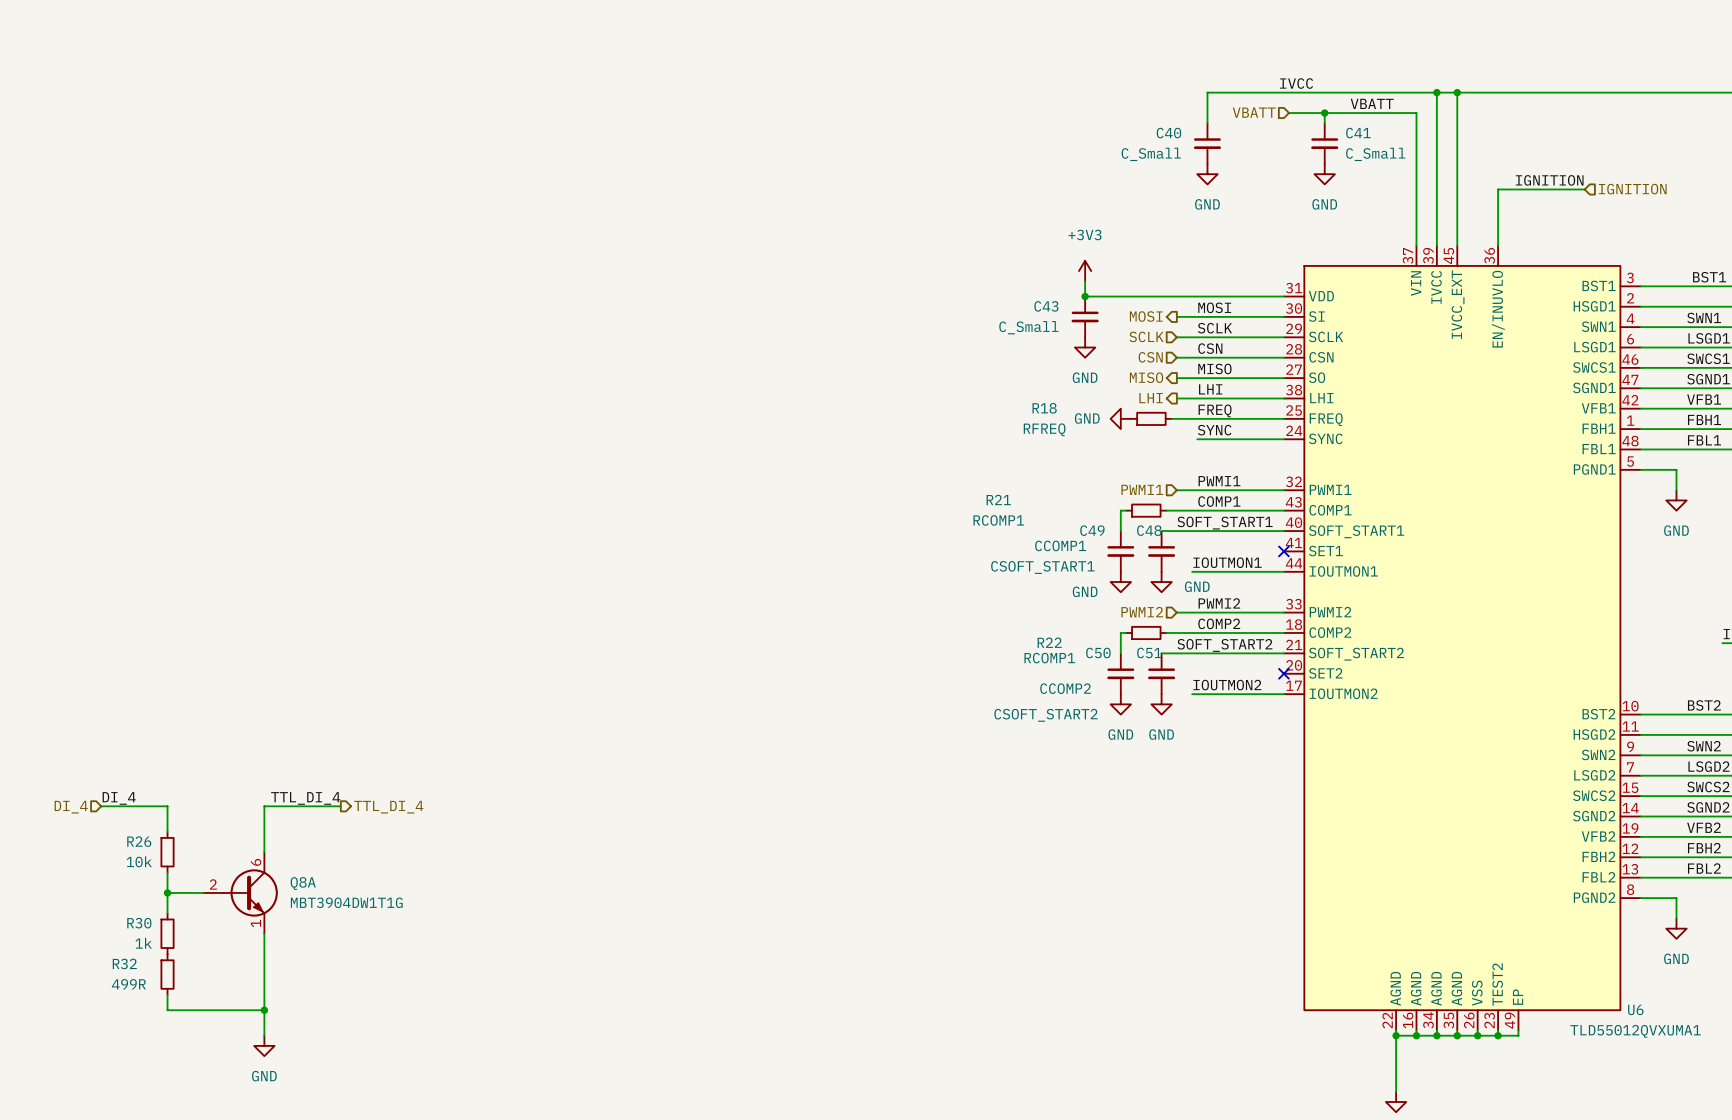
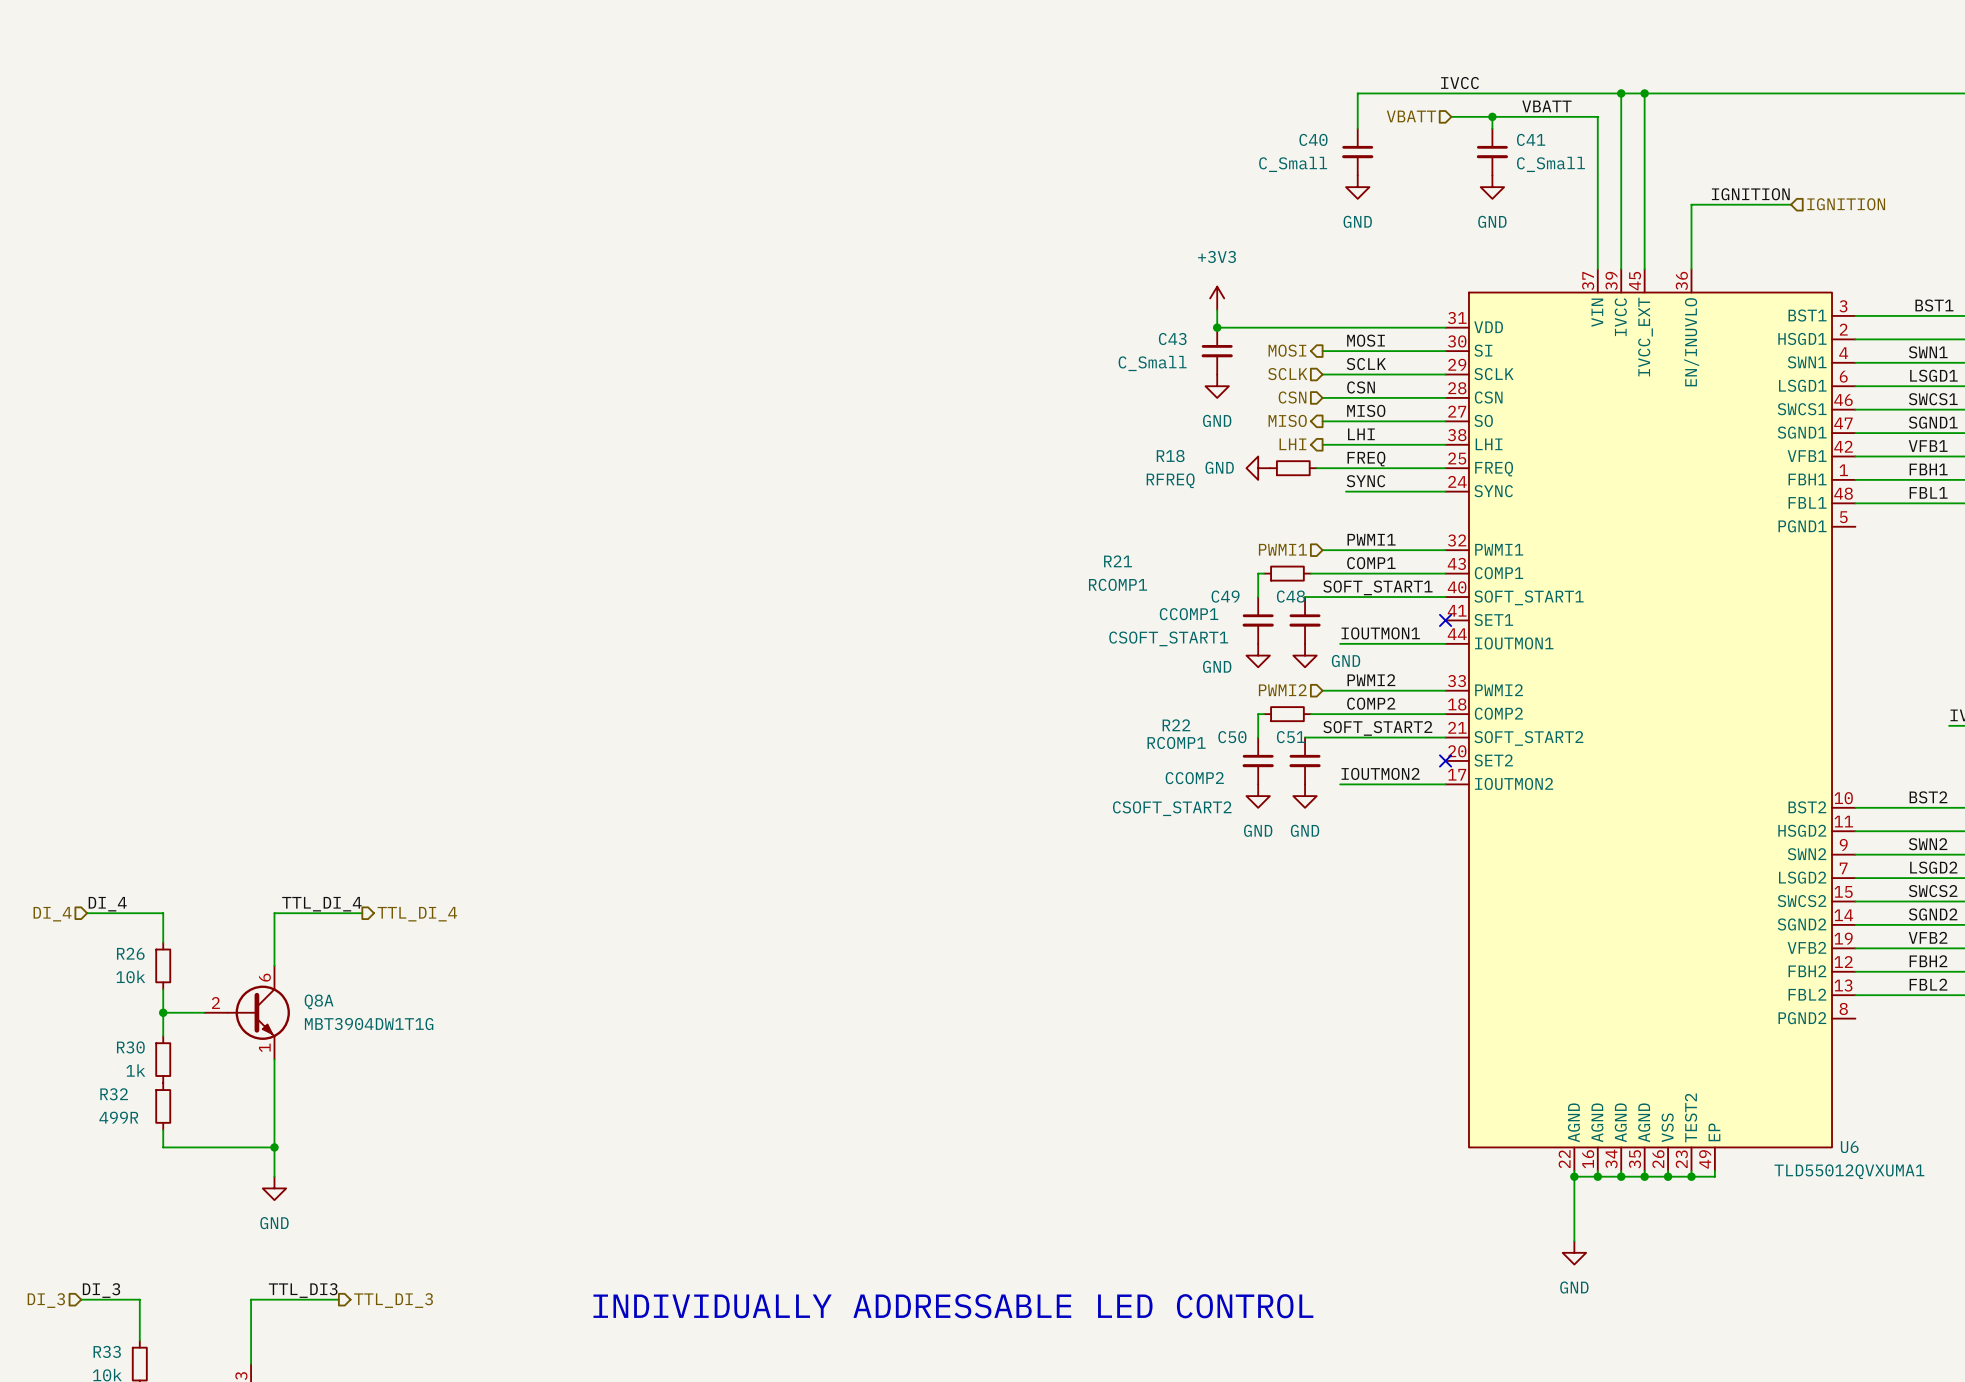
wire: (1640, 469) (1676, 469) (1676, 490) -> none
power symbol: GND (1676, 500) -> none
wire: (1640, 898) (1676, 898) (1676, 918) -> none
power symbol: GND (1676, 928) -> none

